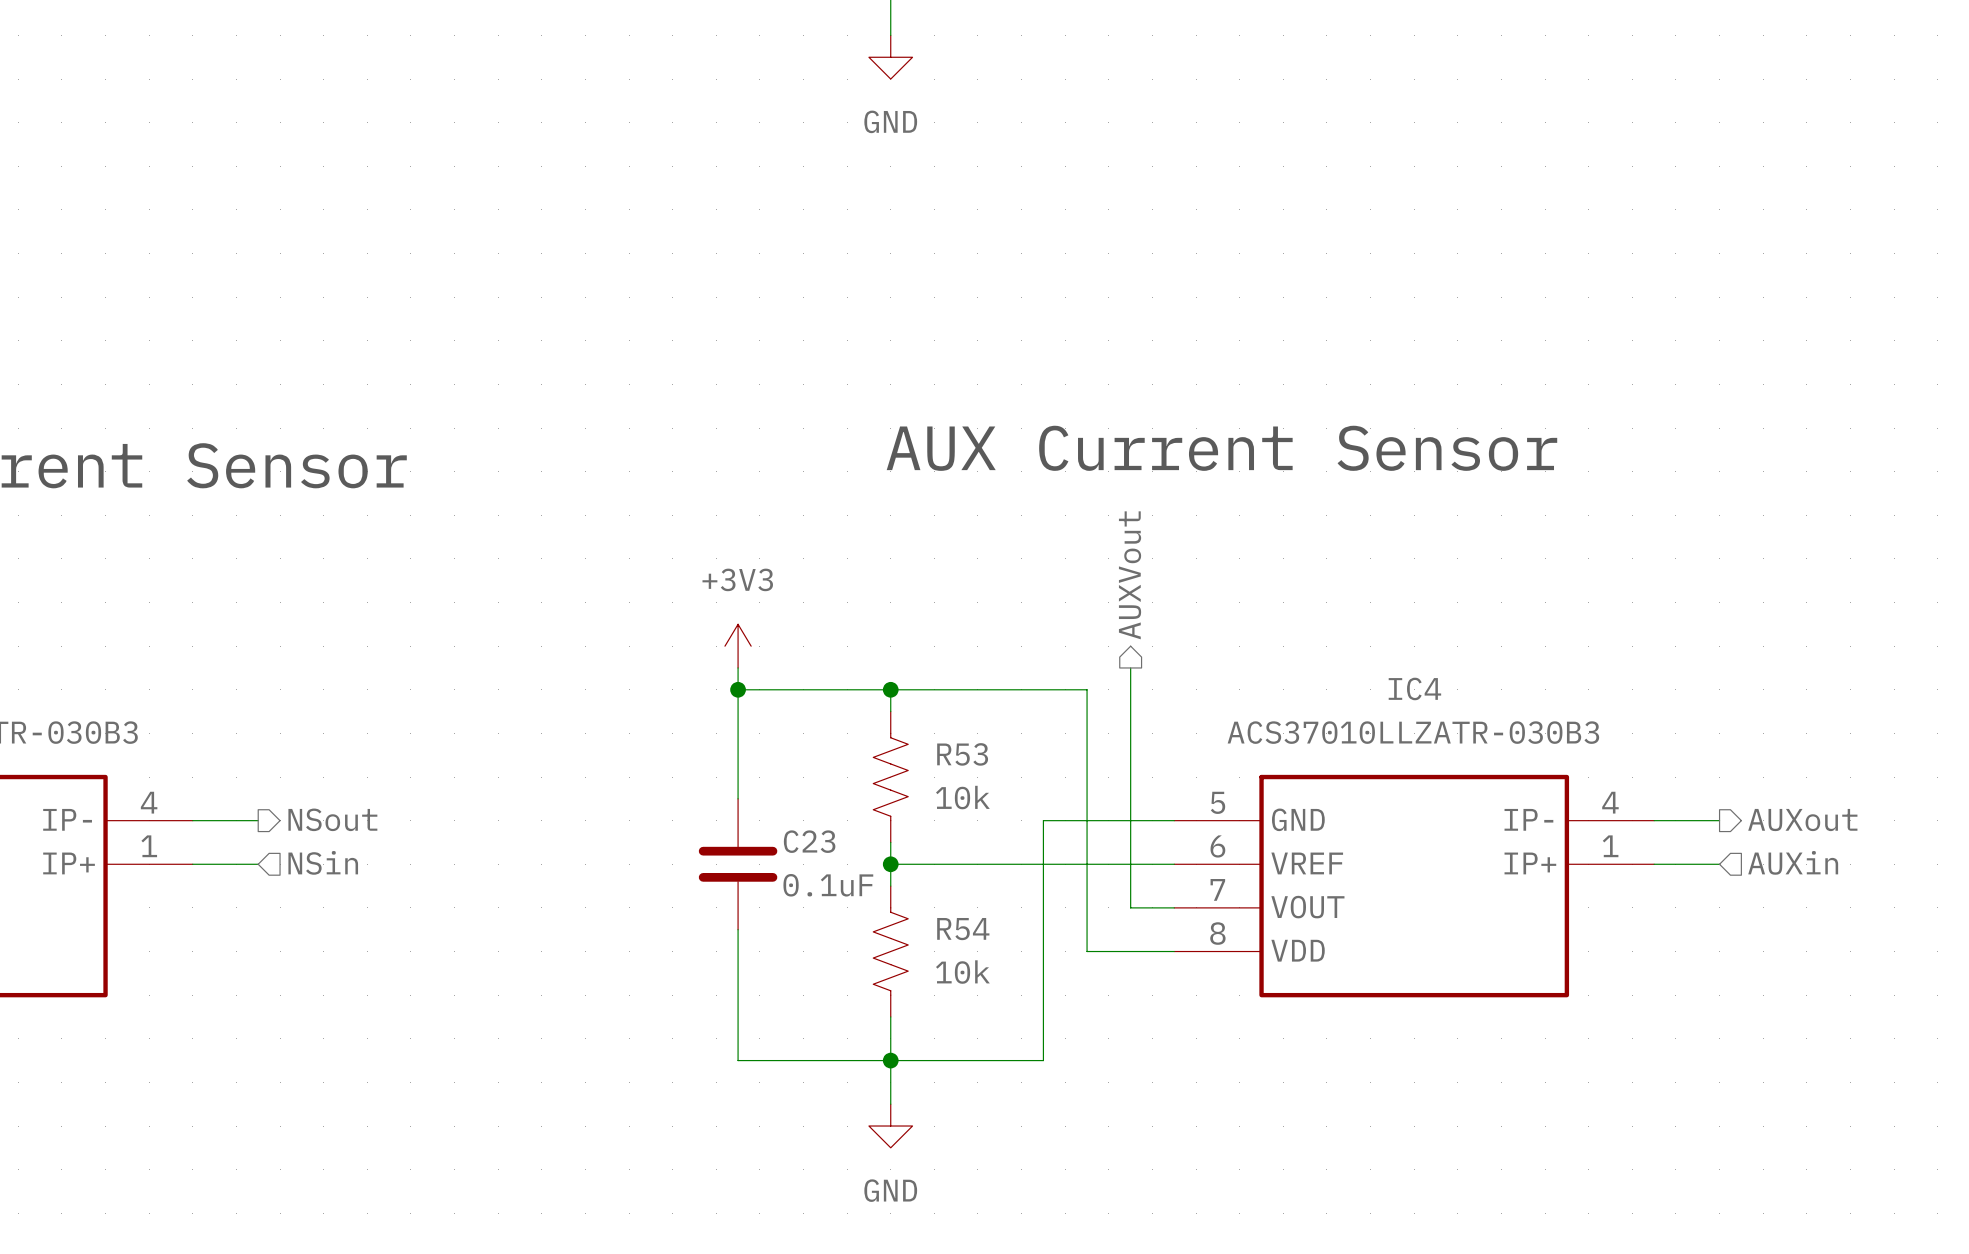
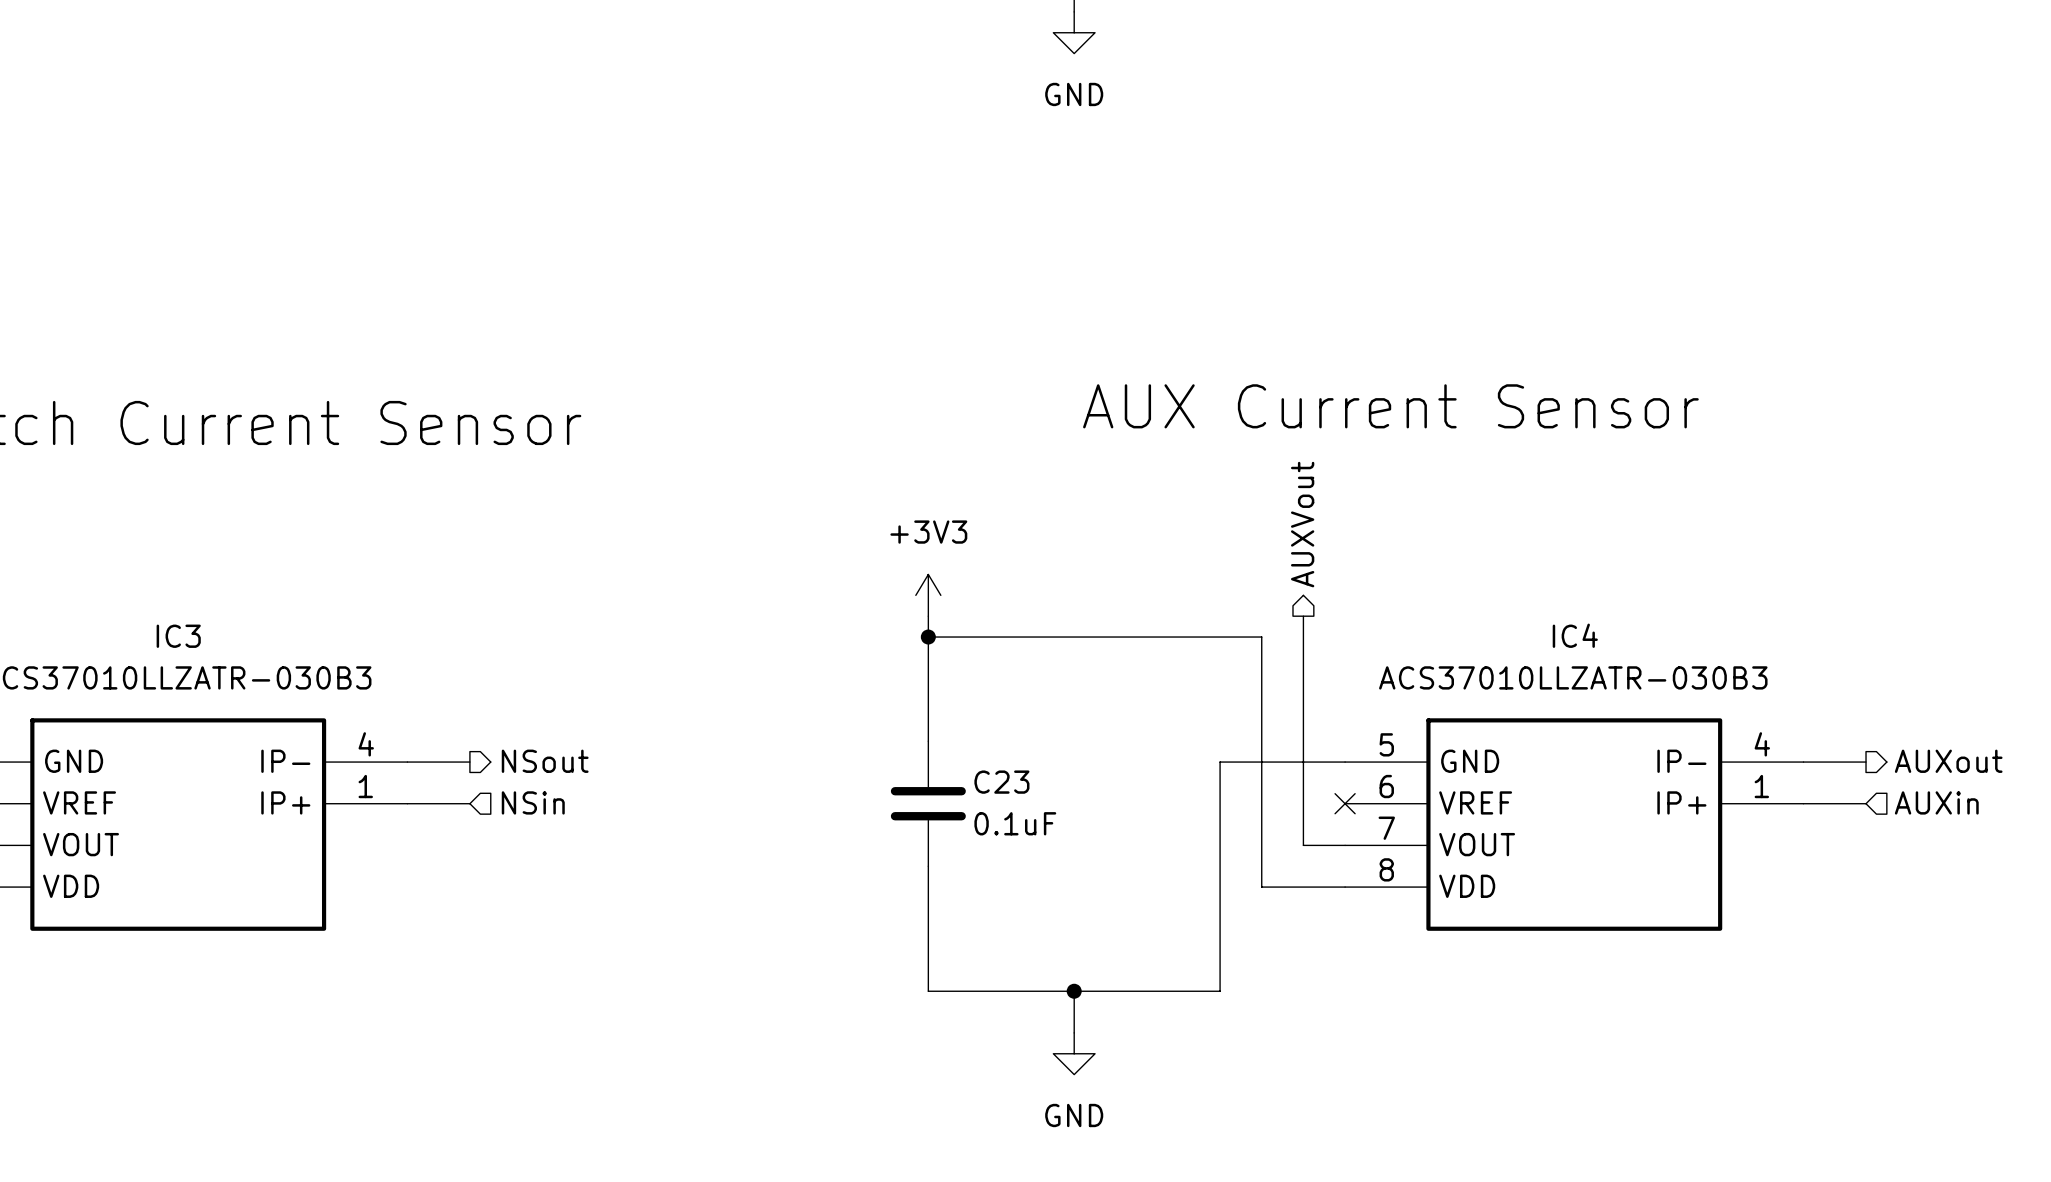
wire: (890, 689) (890, 711) -> none
junction: (890, 689) -> none
R53: 10k (890, 777) -> none
wire: (890, 842) (890, 886) -> none
wire: (890, 864) (1174, 864) -> none
junction: (890, 864) -> none
no-connect mark: none -> (1345, 803)
R54: 10k (890, 951) -> none
wire: (890, 1016) (890, 1060) -> none

